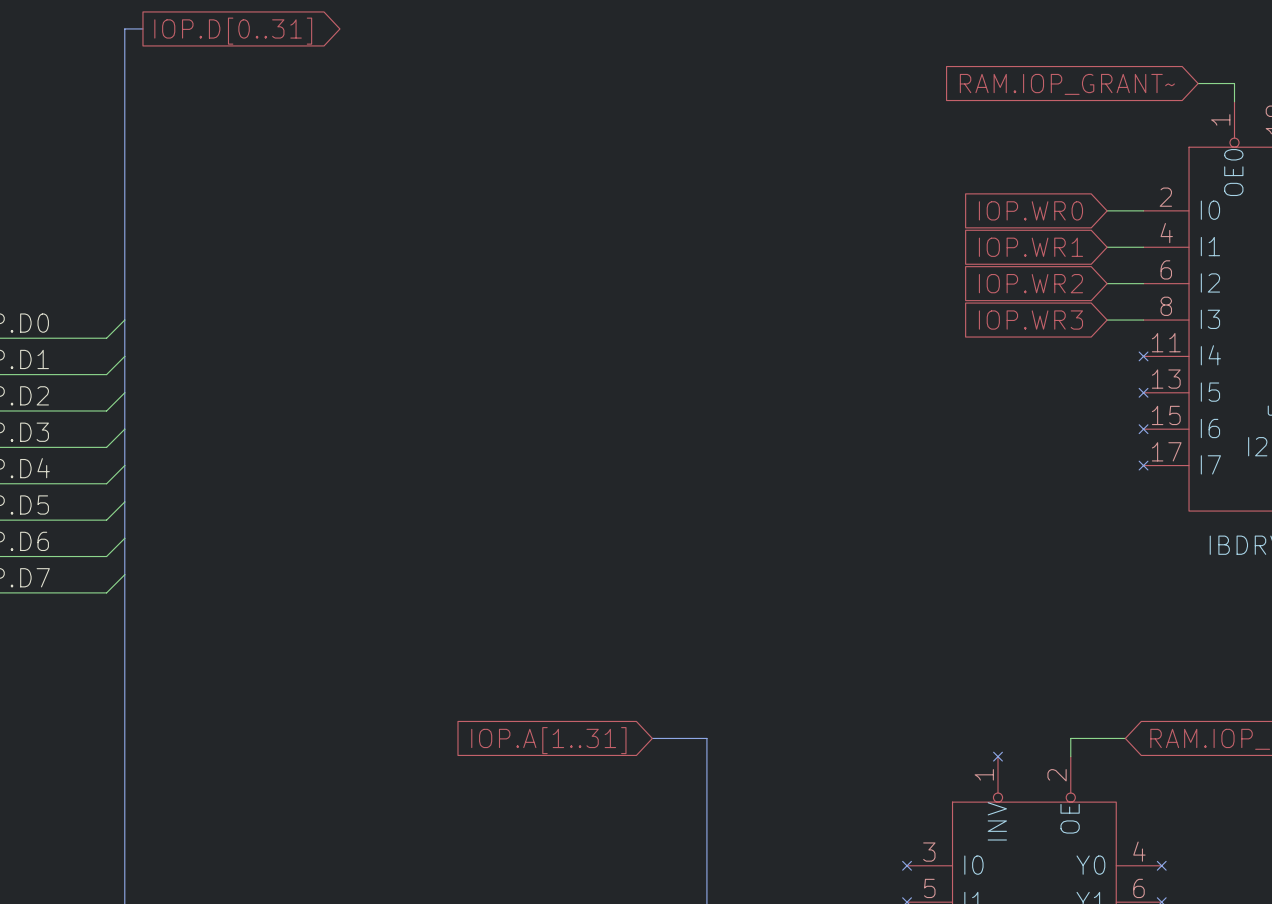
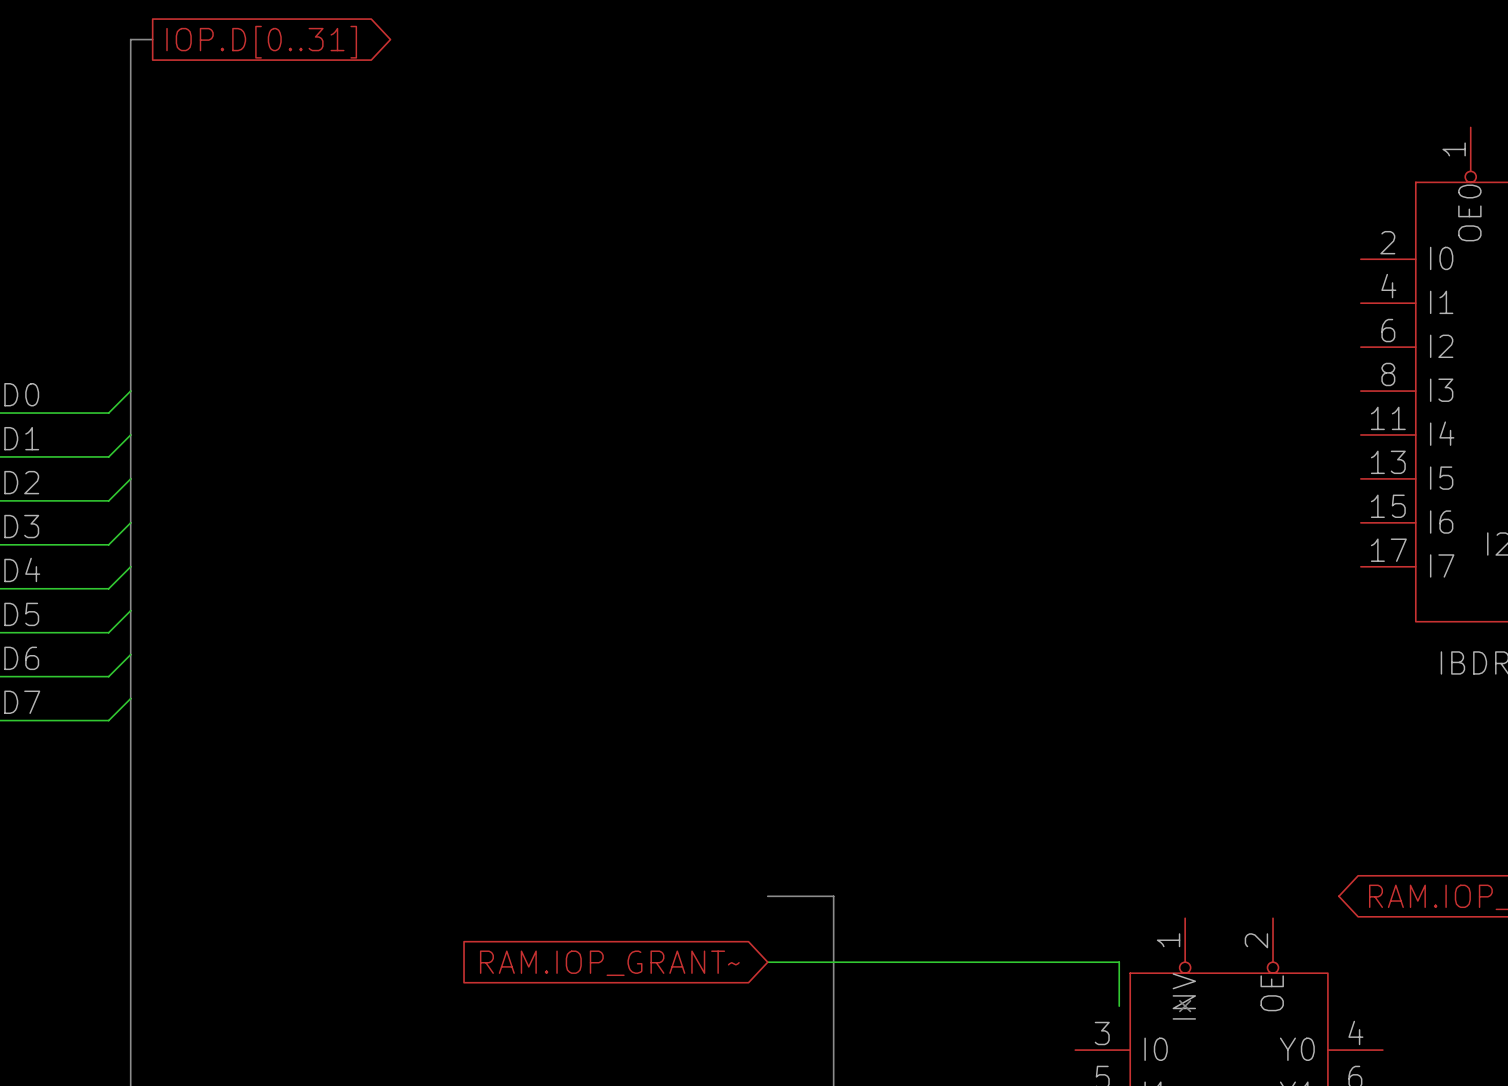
wire: (1198, 83) (1234, 83) (1234, 101) -> none
global label: RAM.IOP_GRANT~ (1067, 84) -> none
global label: IOP.WR0 (1030, 210) -> none
wire: (1107, 210) (1143, 210) -> none
global label: IOP.WR1 (1030, 247) -> none
wire: (1107, 247) (1143, 247) -> none
global label: IOP.WR2 (1030, 283) -> none
wire: (1107, 283) (1143, 283) -> none
global label: IOP.WR3 (1030, 320) -> none
wire: (1107, 320) (1143, 320) -> none
no-connect mark: (1143, 356) -> none
no-connect mark: (1143, 392) -> none
no-connect mark: (1143, 429) -> none
no-connect mark: (1143, 465) -> none
wire: (1125, 738) (1070, 738) (1070, 756) -> none
global label: IOP.A[1..31] (548, 740) -> none
no-connect mark: (998, 756) -> none
global label: none -> RAM.IOP_GRANT~ (609, 963)
wire: none -> (767, 962) (1119, 962) (1119, 1006)
no-connect mark: none -> (1185, 1006)
no-connect mark: (907, 865) -> none
no-connect mark: (1161, 865) -> none

